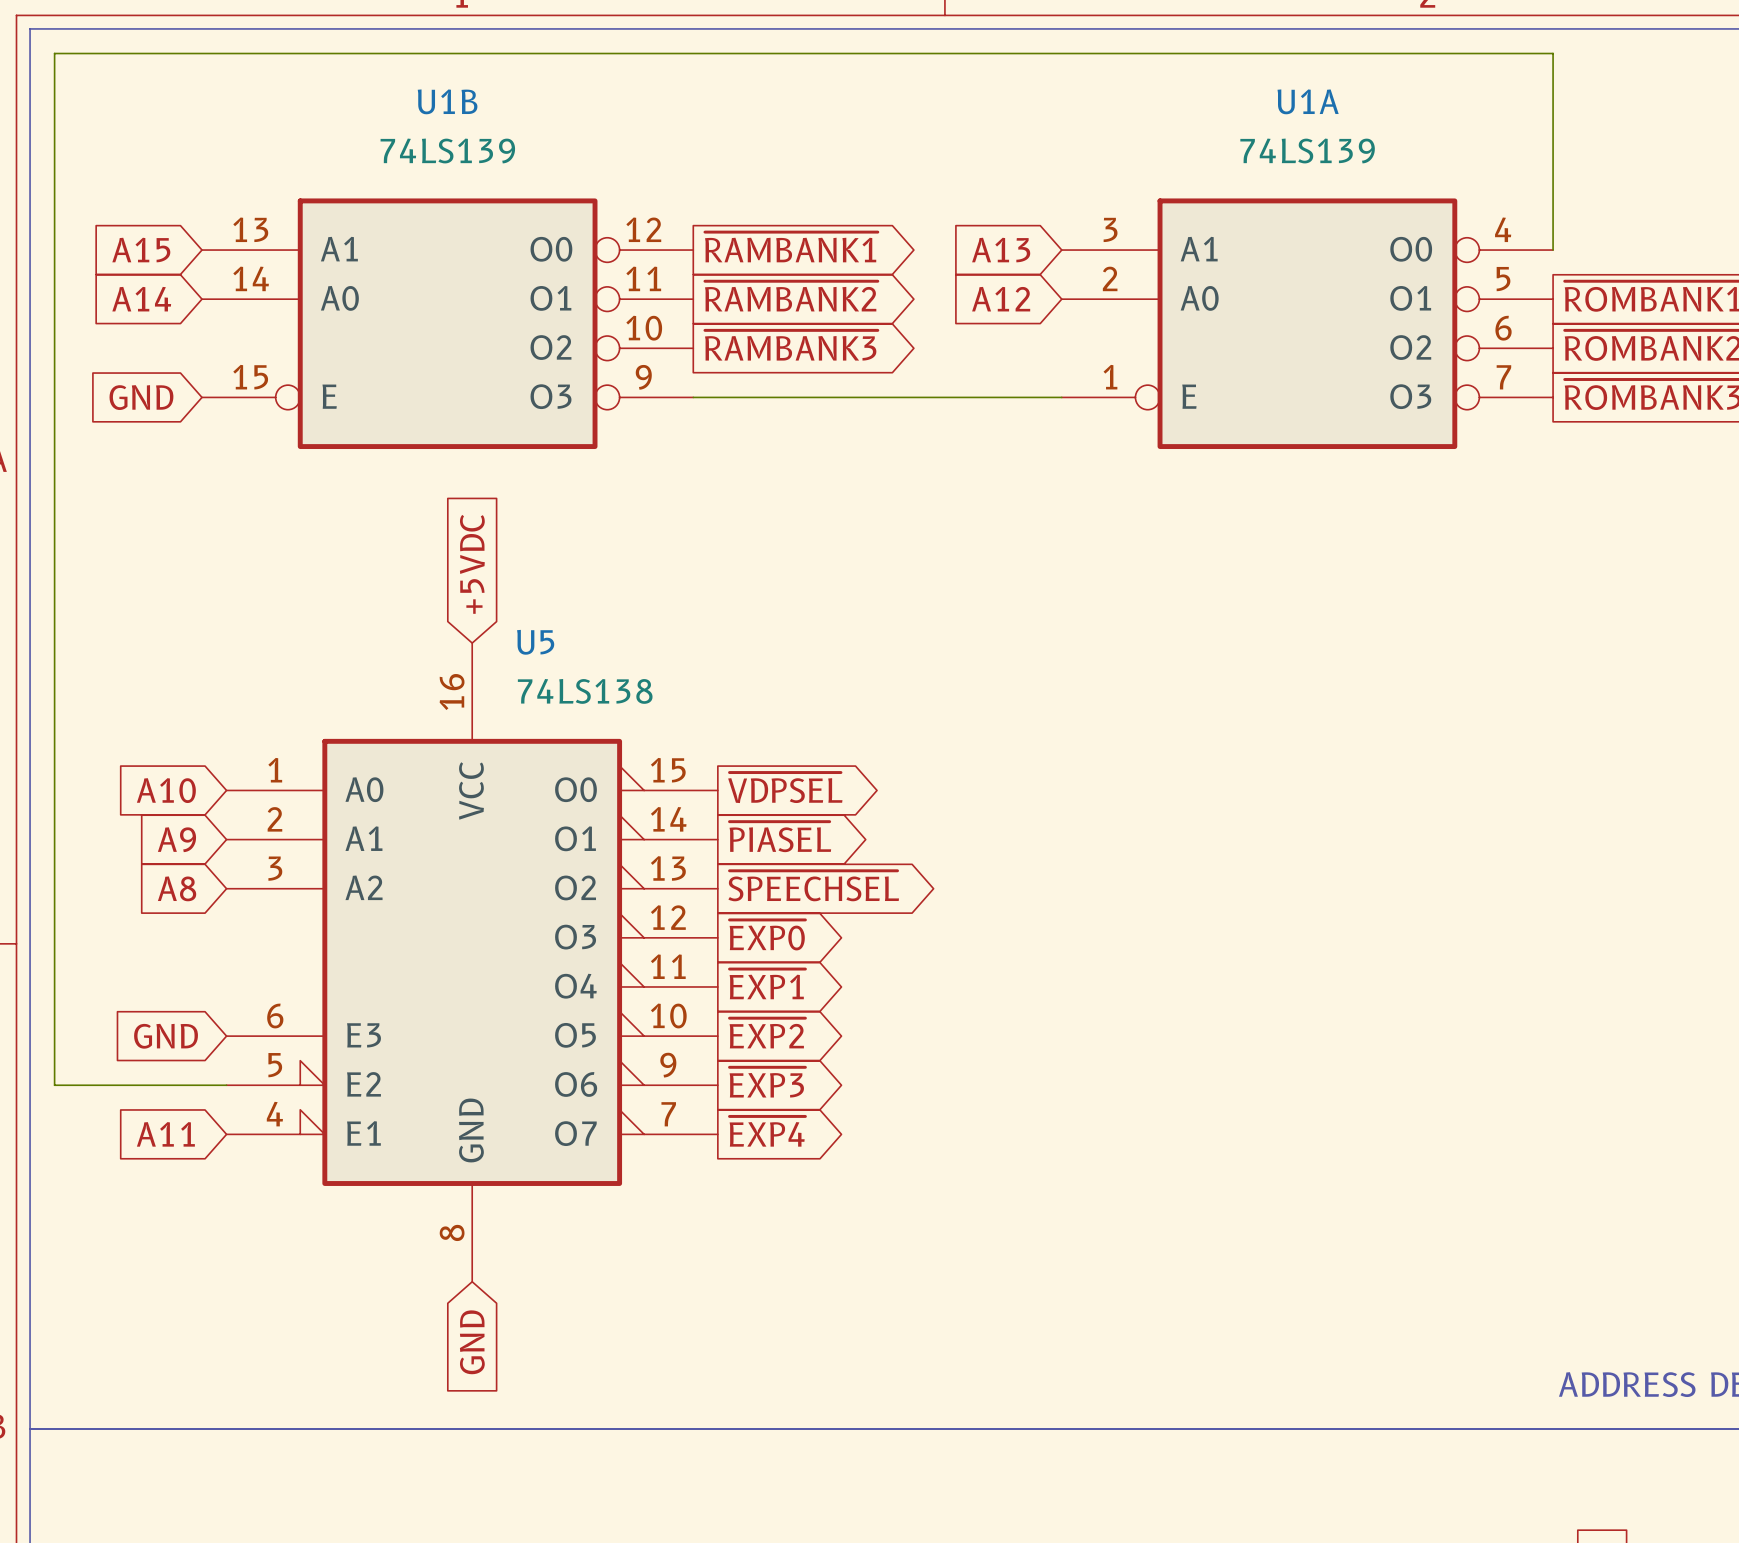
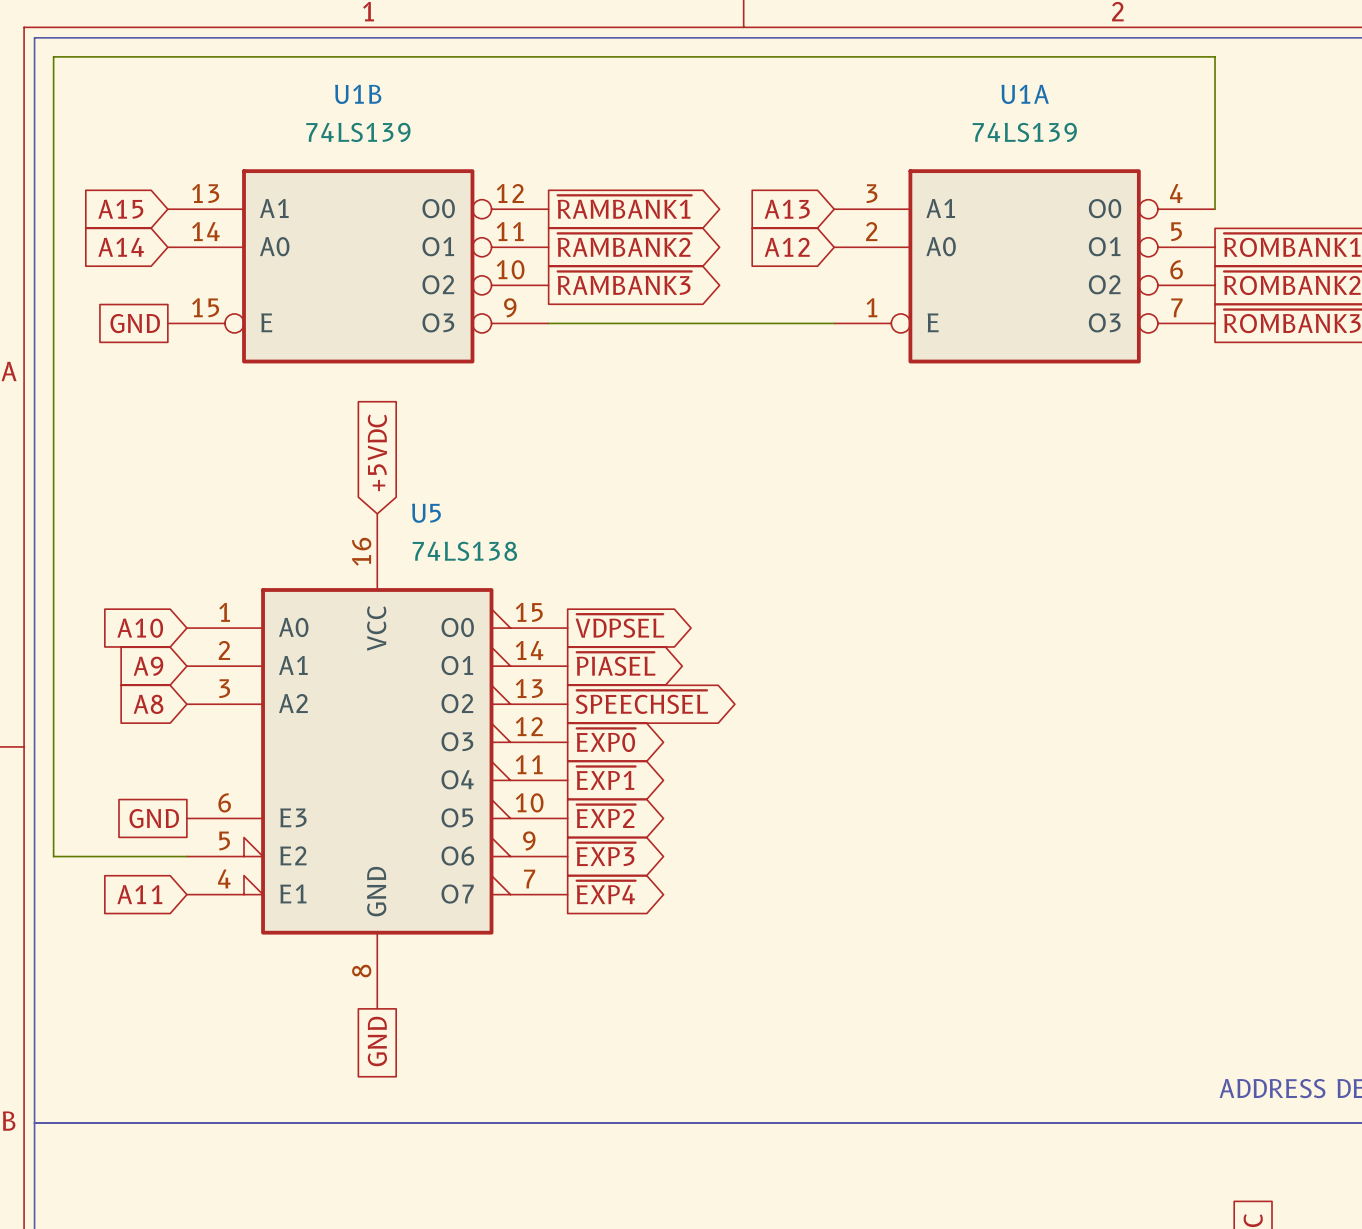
global label shape: input (141, 397) -> passive (135, 323)
global label shape: input (166, 1036) -> passive (154, 818)
global label shape: input (472, 1342) -> passive (377, 1041)

